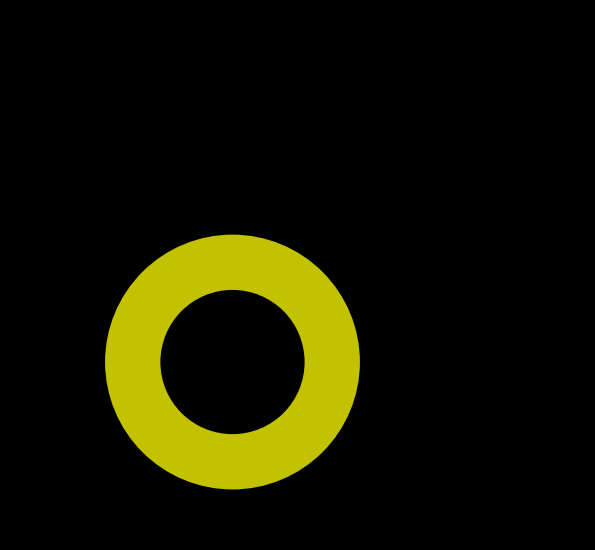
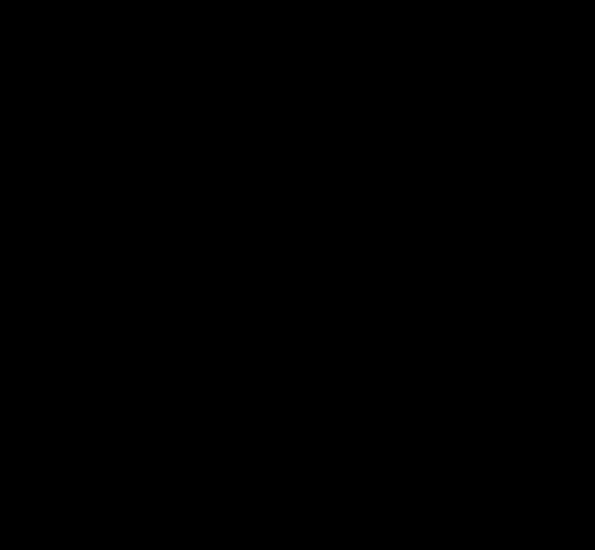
part: (232, 362) -> none

